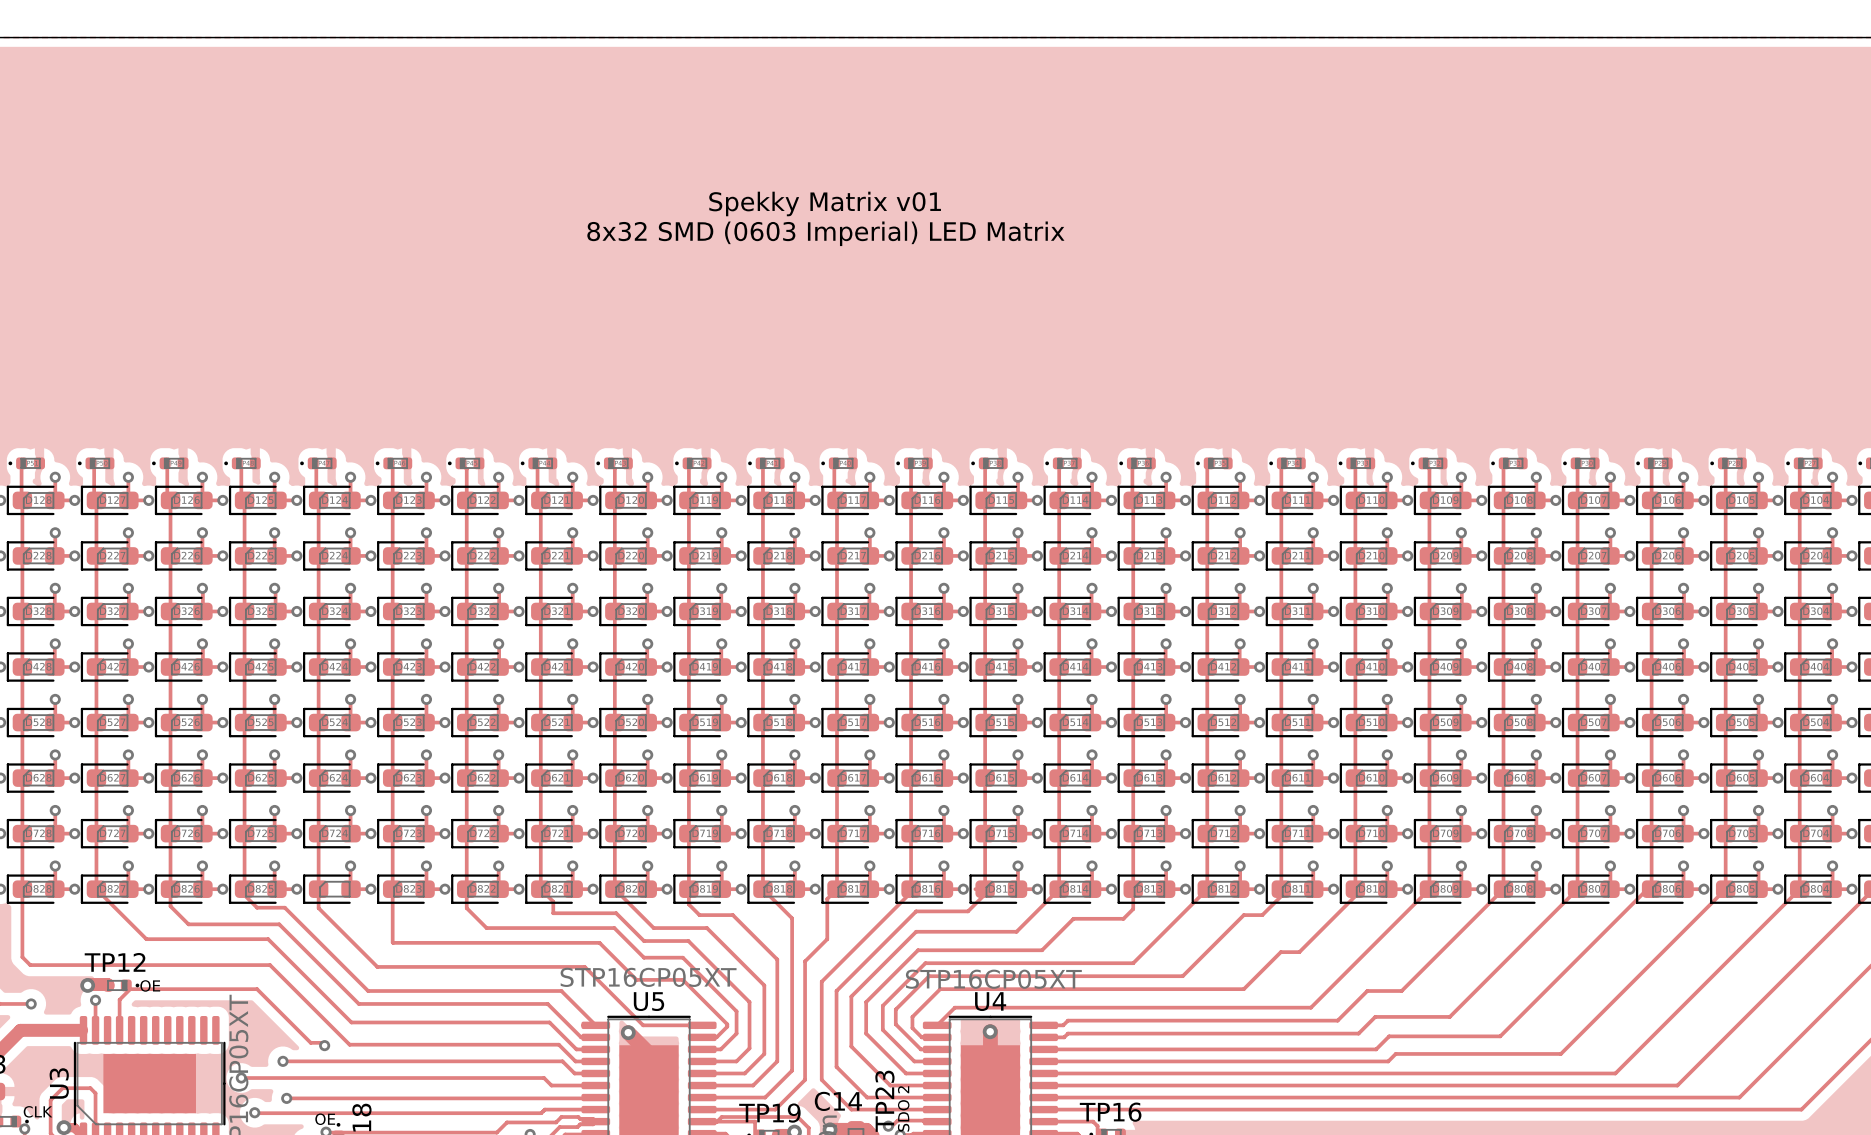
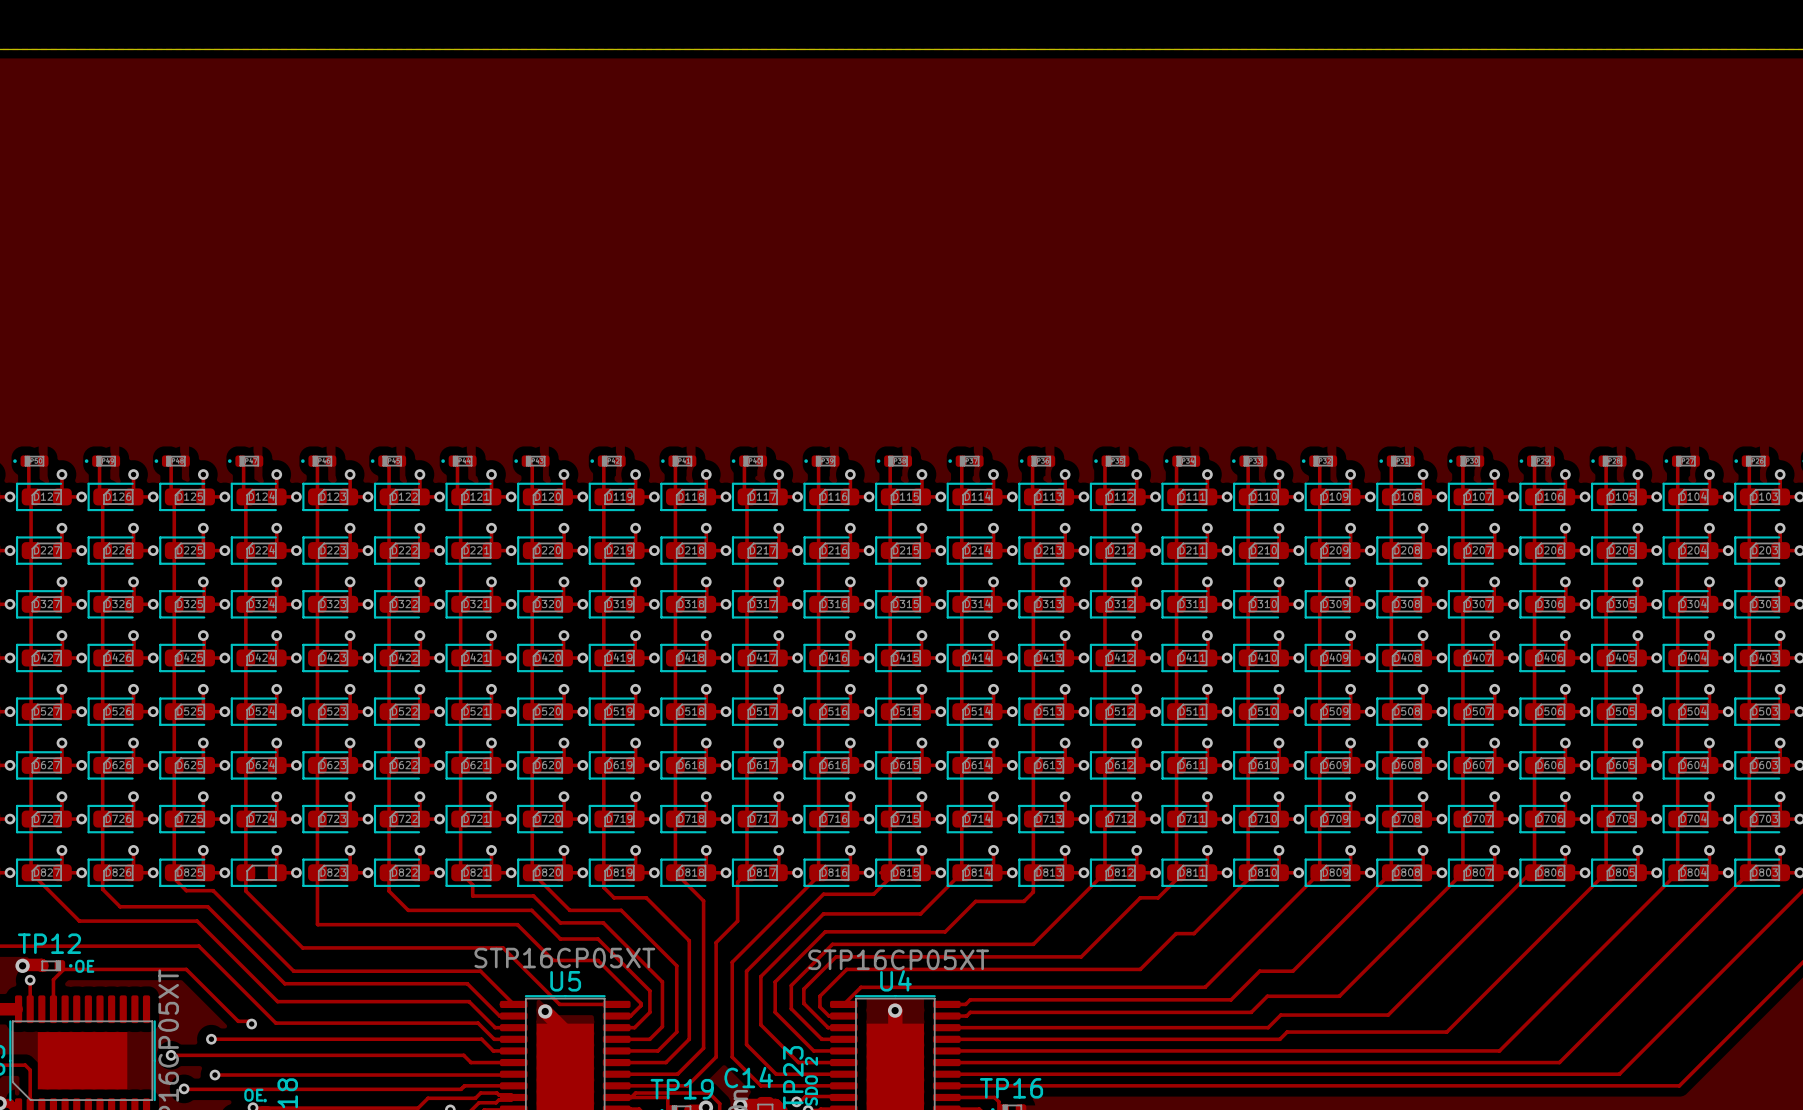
text: Spekky Matrix v01 (825, 203) -> none
text: 8x32 SMD (0603 Imperial) LED Matrix (825, 233) -> none

